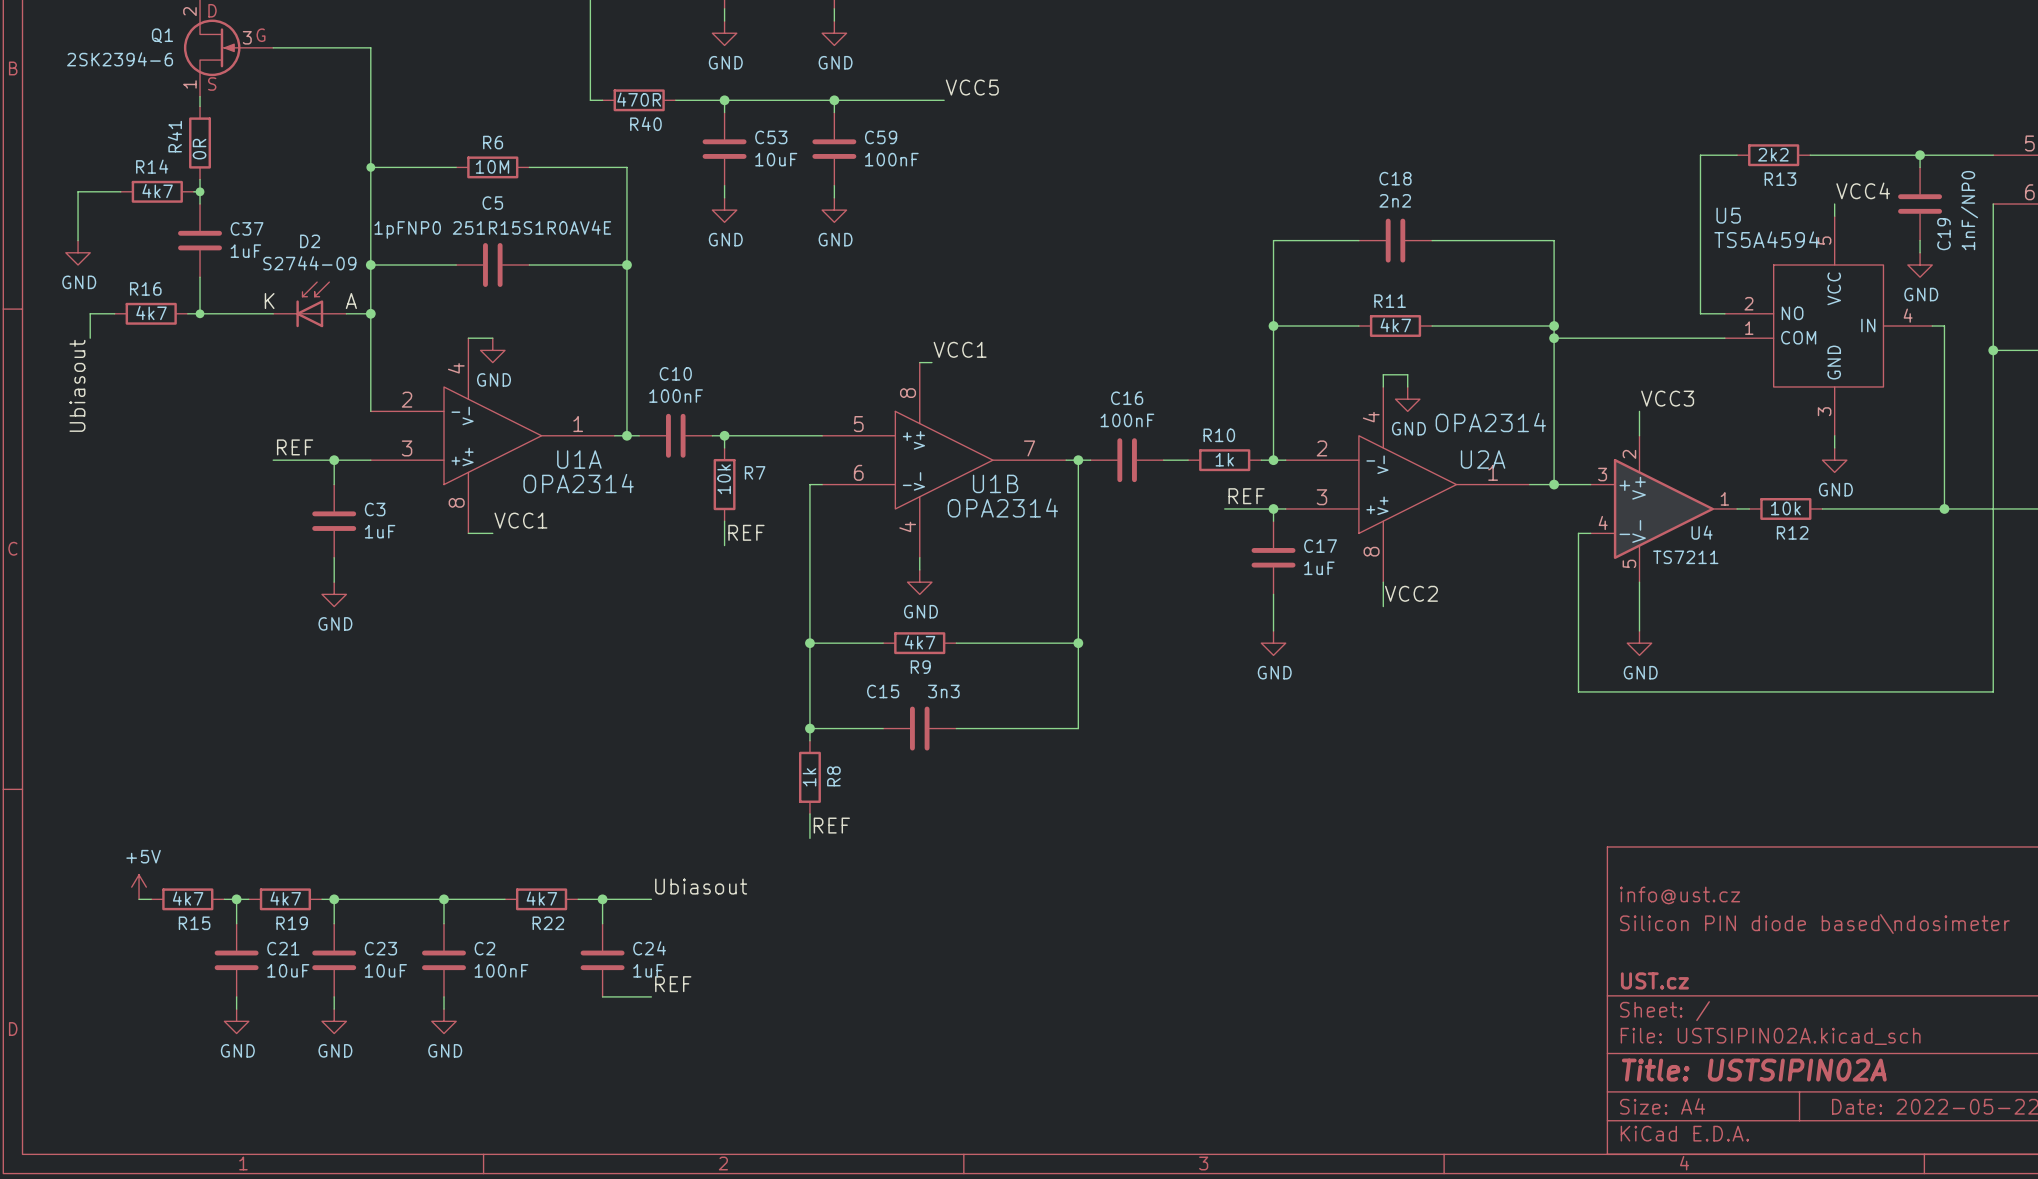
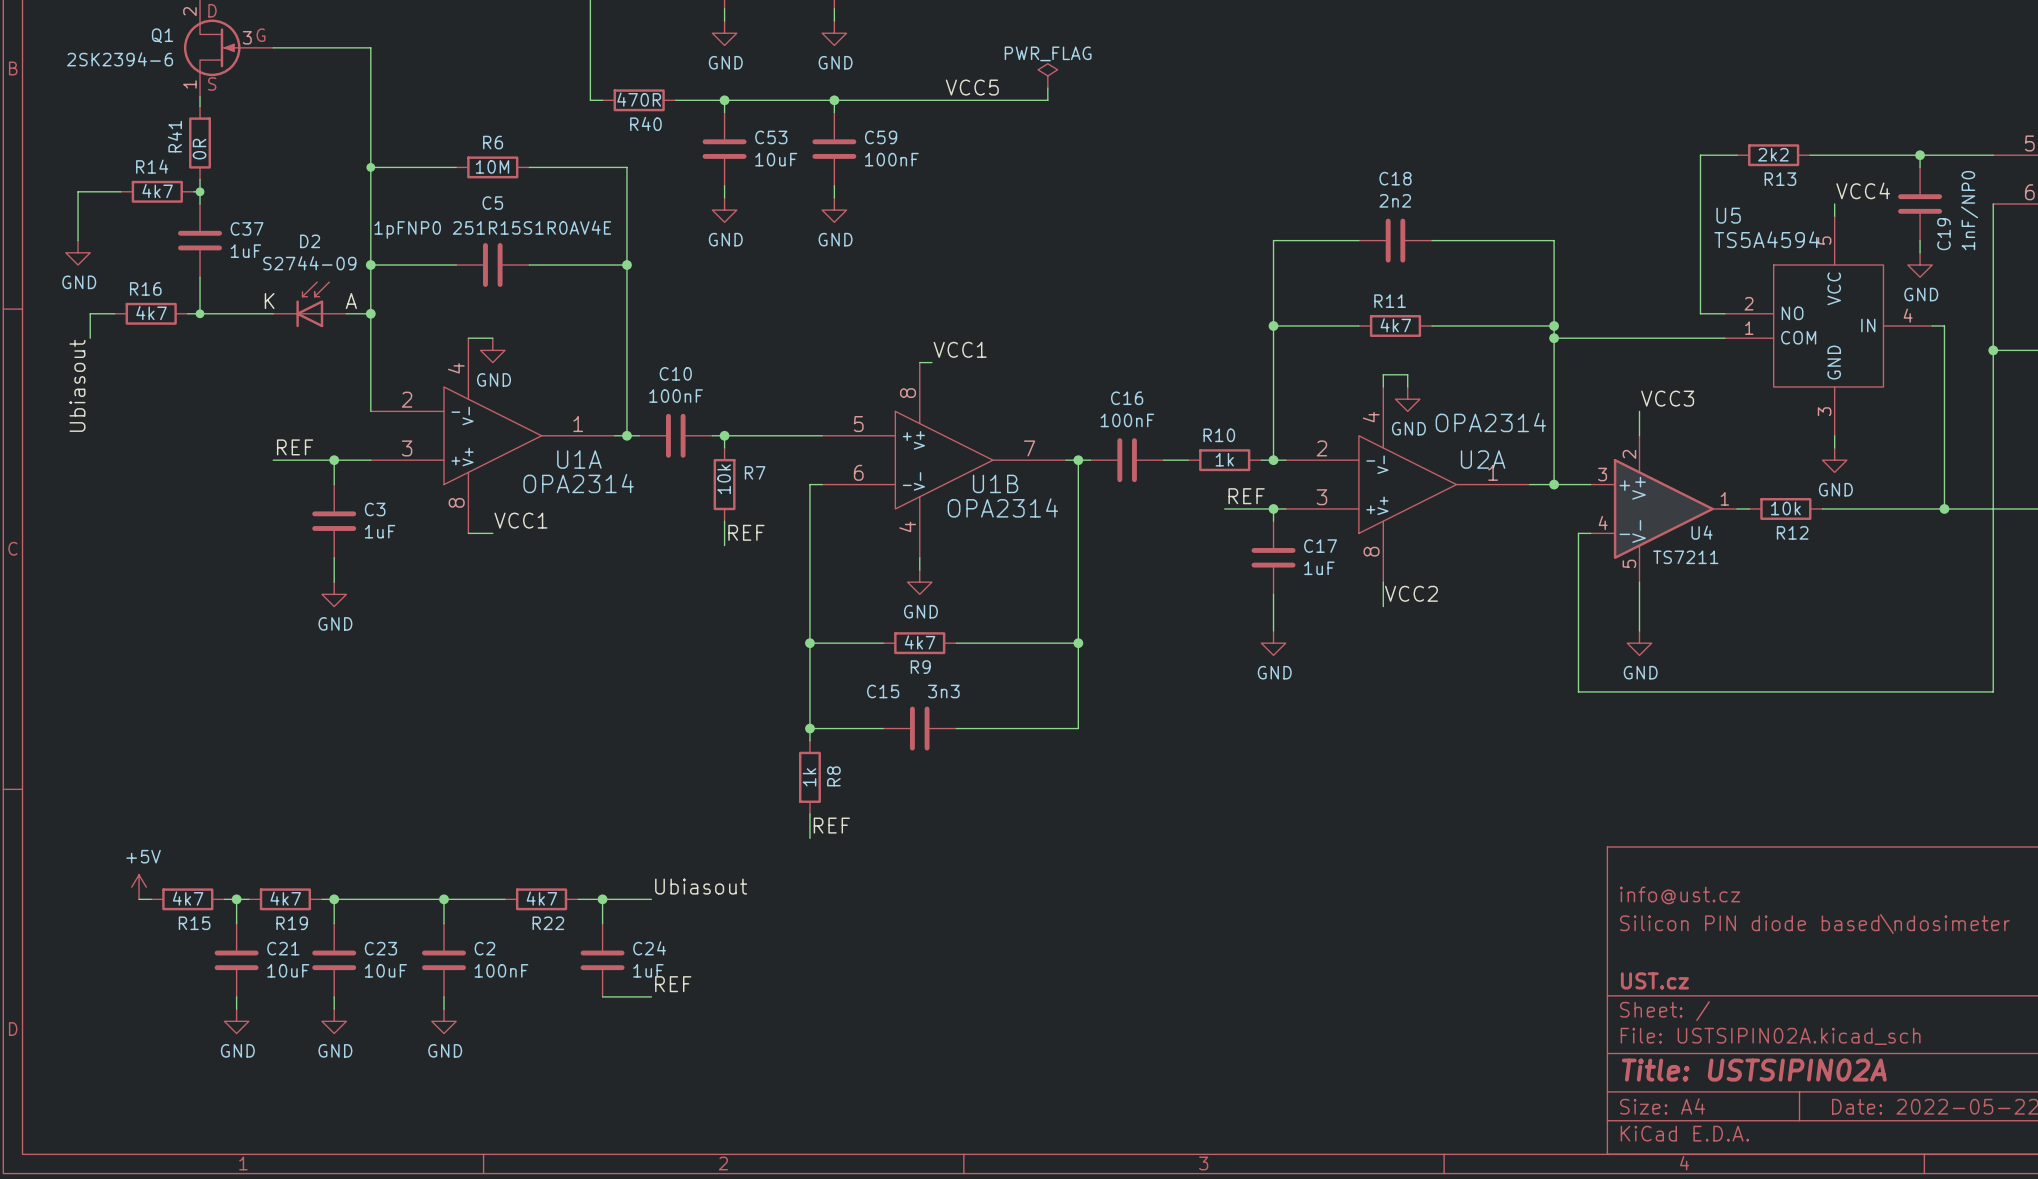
power symbol: none -> PWR_FLAG (1047, 75)
wire: none -> (1047, 88) (1047, 100) (944, 100)

